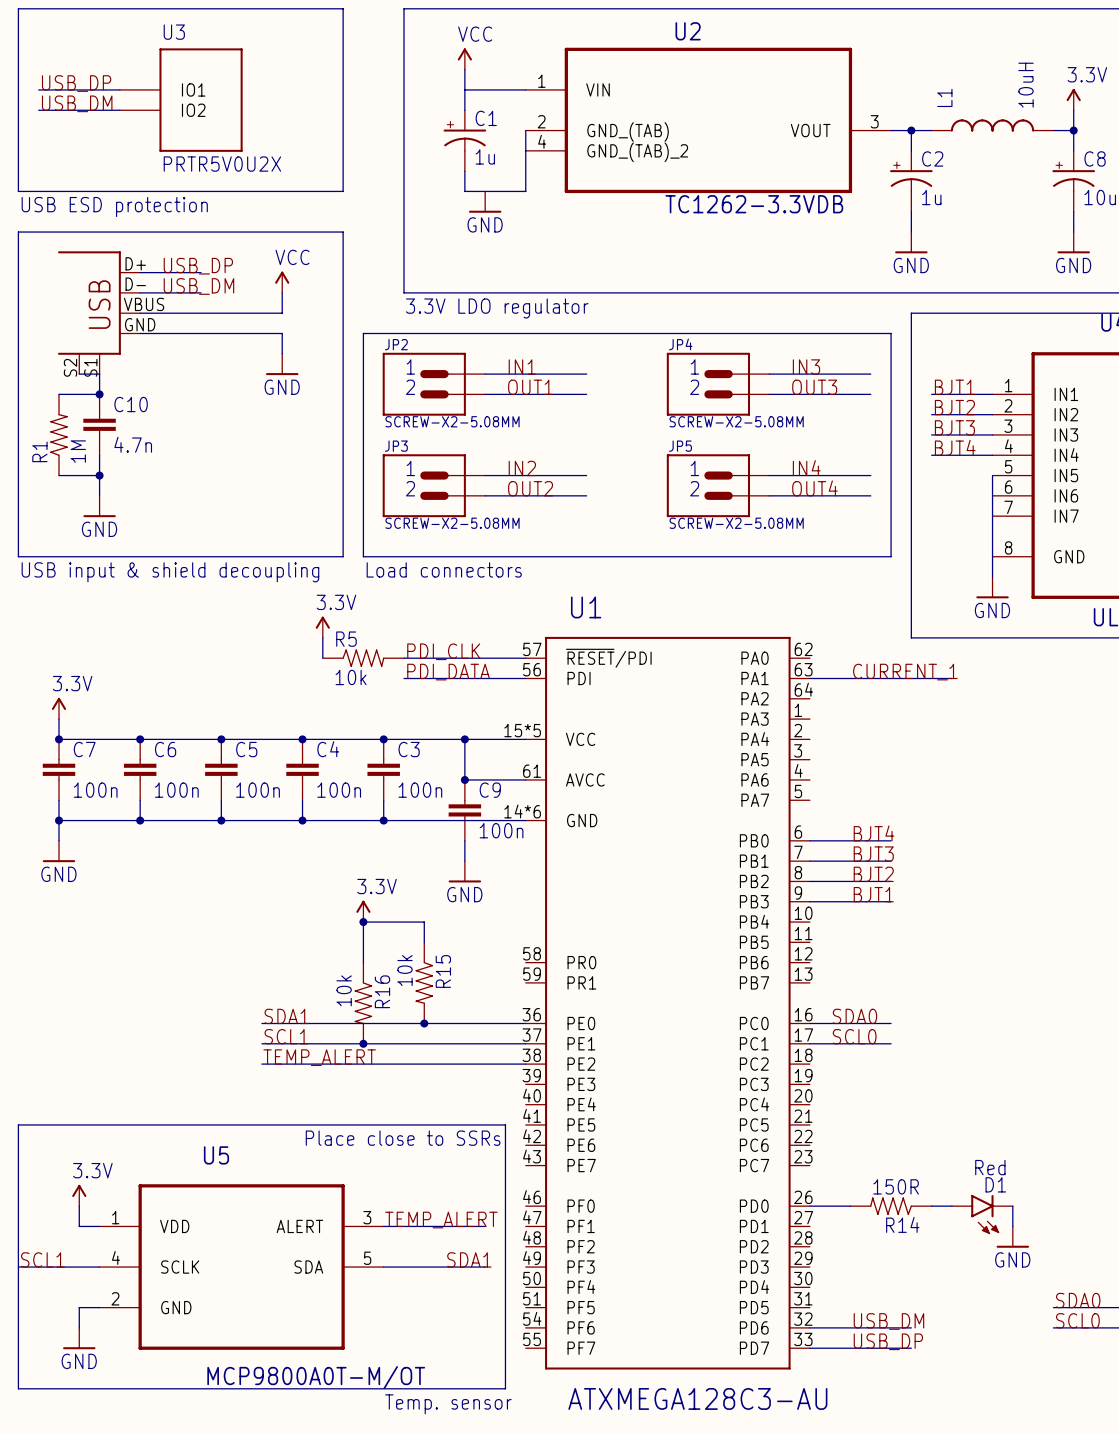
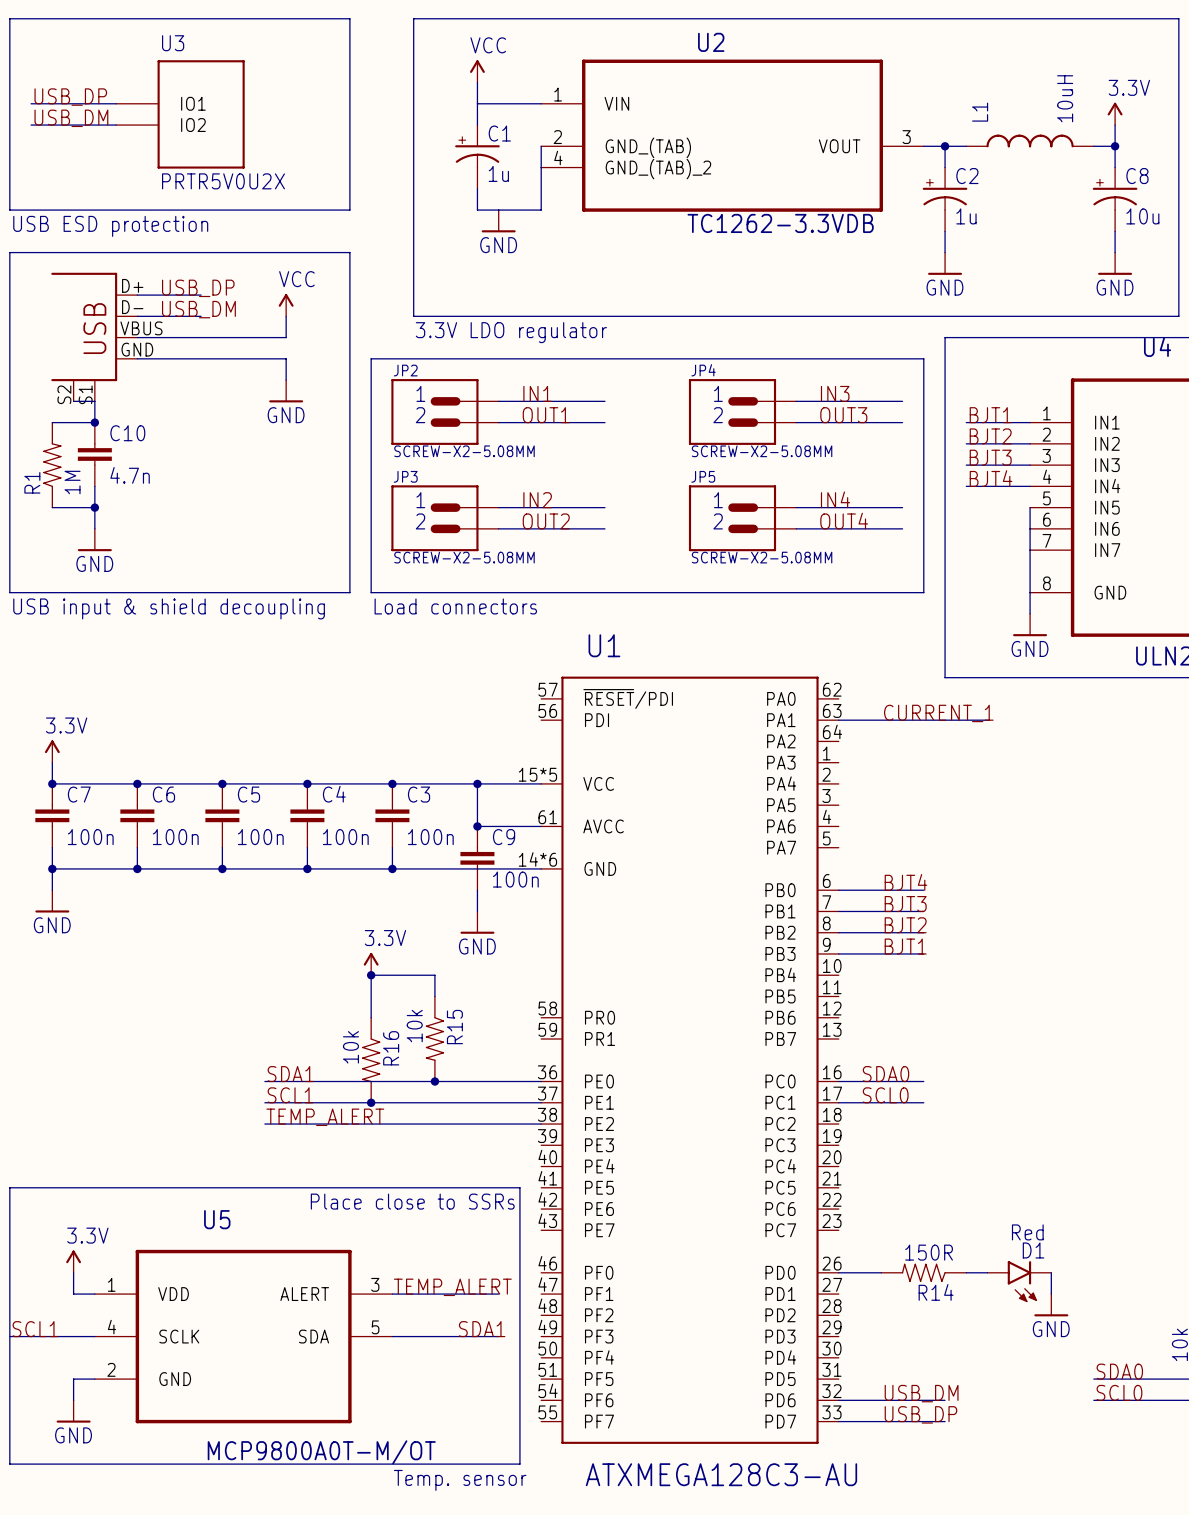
power symbol: 3.3V (322, 627) -> none
wire: (322, 637) (322, 658) -> none
label: PDI_CLK (443, 651) -> none
R5: 10k (363, 658) -> none
wire: (403, 658) (525, 658) -> none
label: PDI_DATA (448, 672) -> none
wire: (403, 678) (525, 678) -> none

